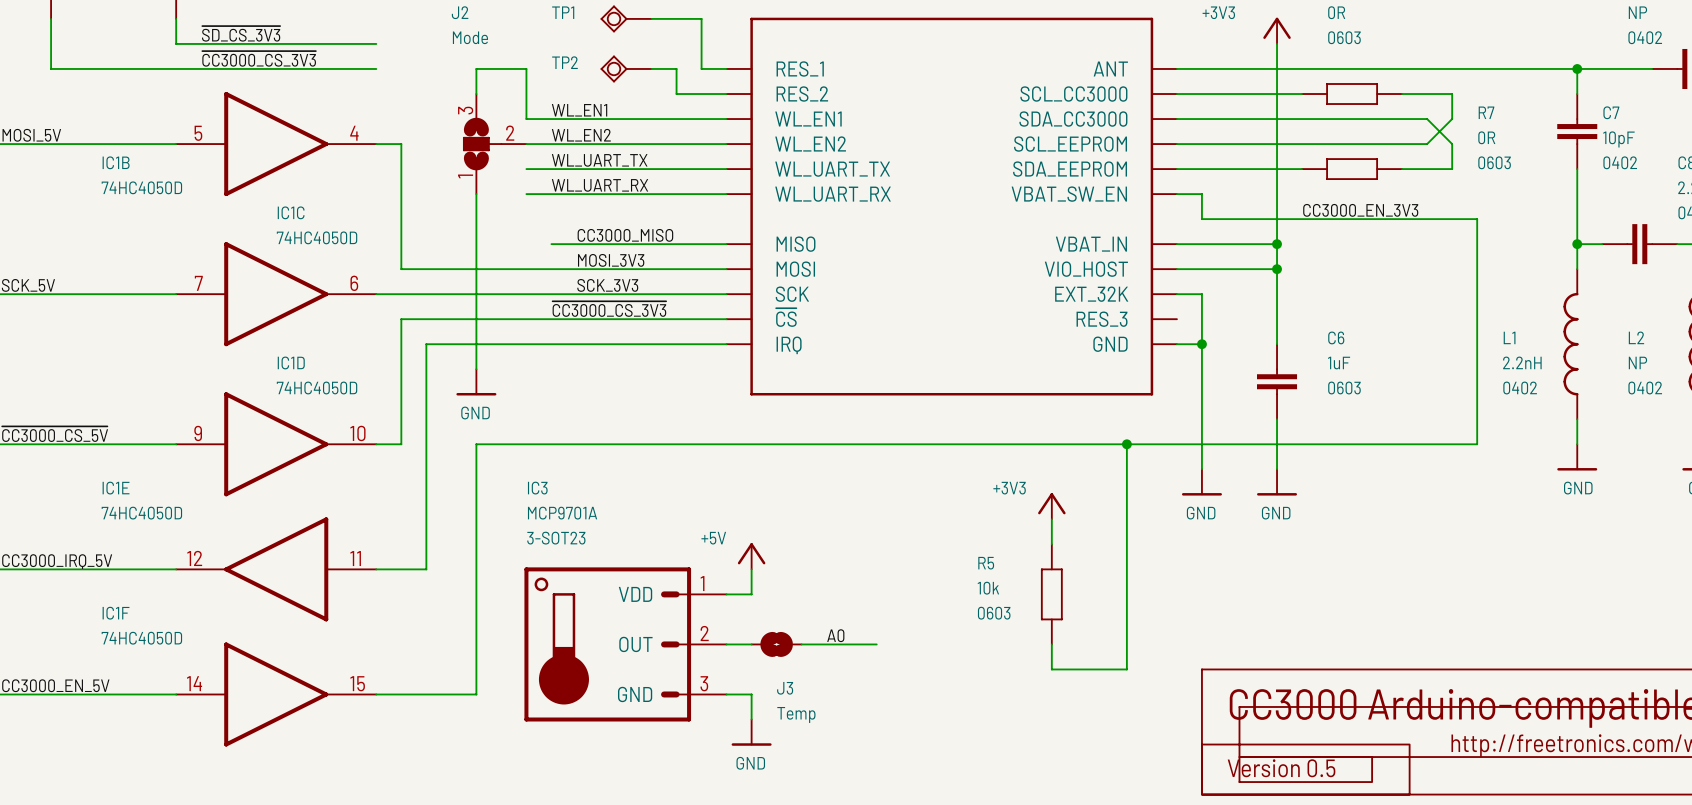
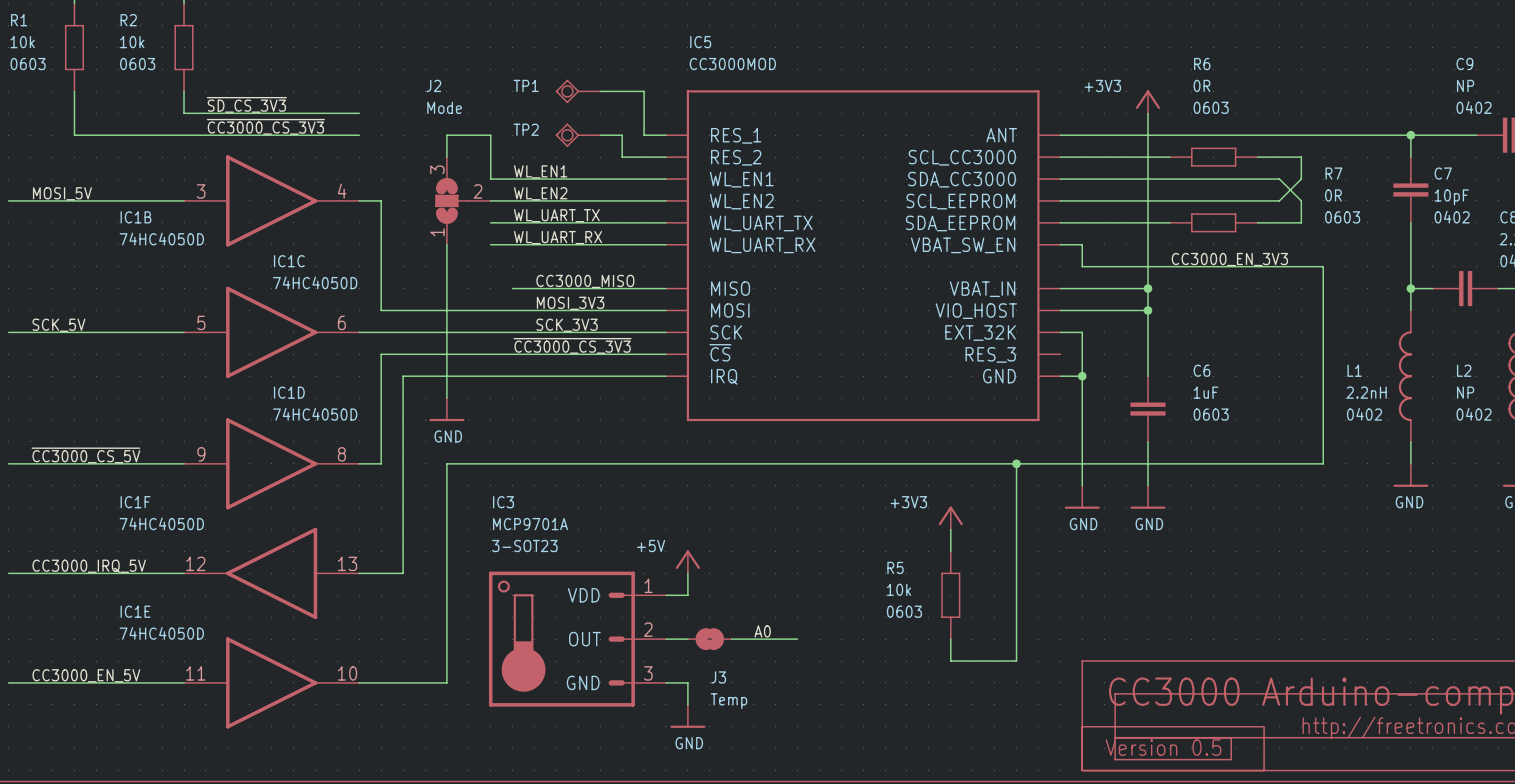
IC1B pin number: 5 (198, 133) -> 3 (201, 191)
IC1C pin number: 7 (198, 283) -> 5 (201, 322)
IC1D pin number: 10 (357, 433) -> 8 (341, 454)
IC1E symbol: [176, 517, 377, 622] -> [184, 637, 360, 729]
IC1F symbol: [176, 642, 377, 747] -> [184, 527, 360, 619]

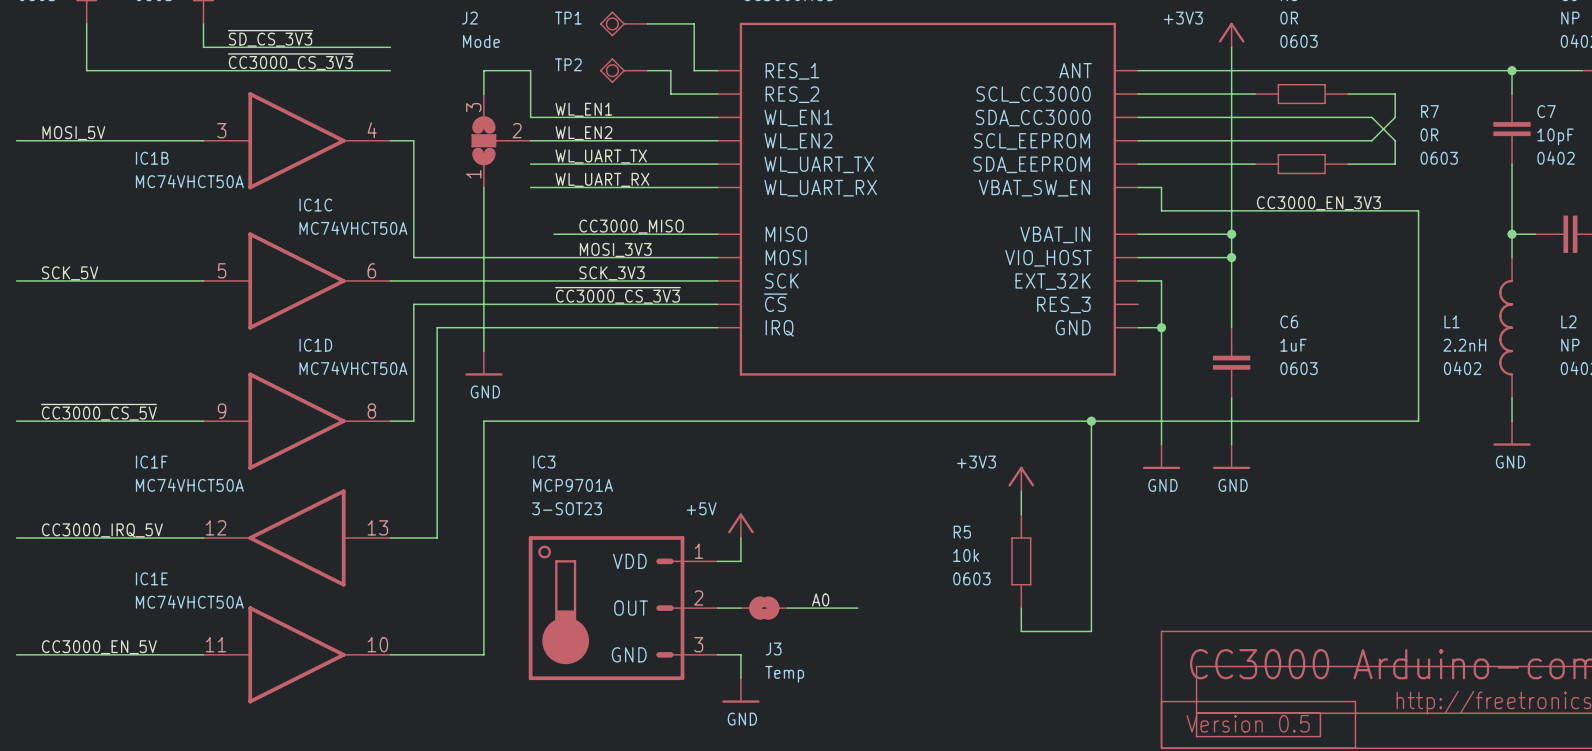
IC1B value: 74HC4050D (161, 239) -> MC74VHCT50A (189, 181)
IC1C value: 74HC4050D (315, 282) -> MC74VHCT50A (353, 228)
IC1D value: 74HC4050D (315, 414) -> MC74VHCT50A (353, 368)
IC1F value: 74HC4050D (161, 523) -> MC74VHCT50A (189, 485)
IC1E value: 74HC4050D (161, 633) -> MC74VHCT50A (189, 601)

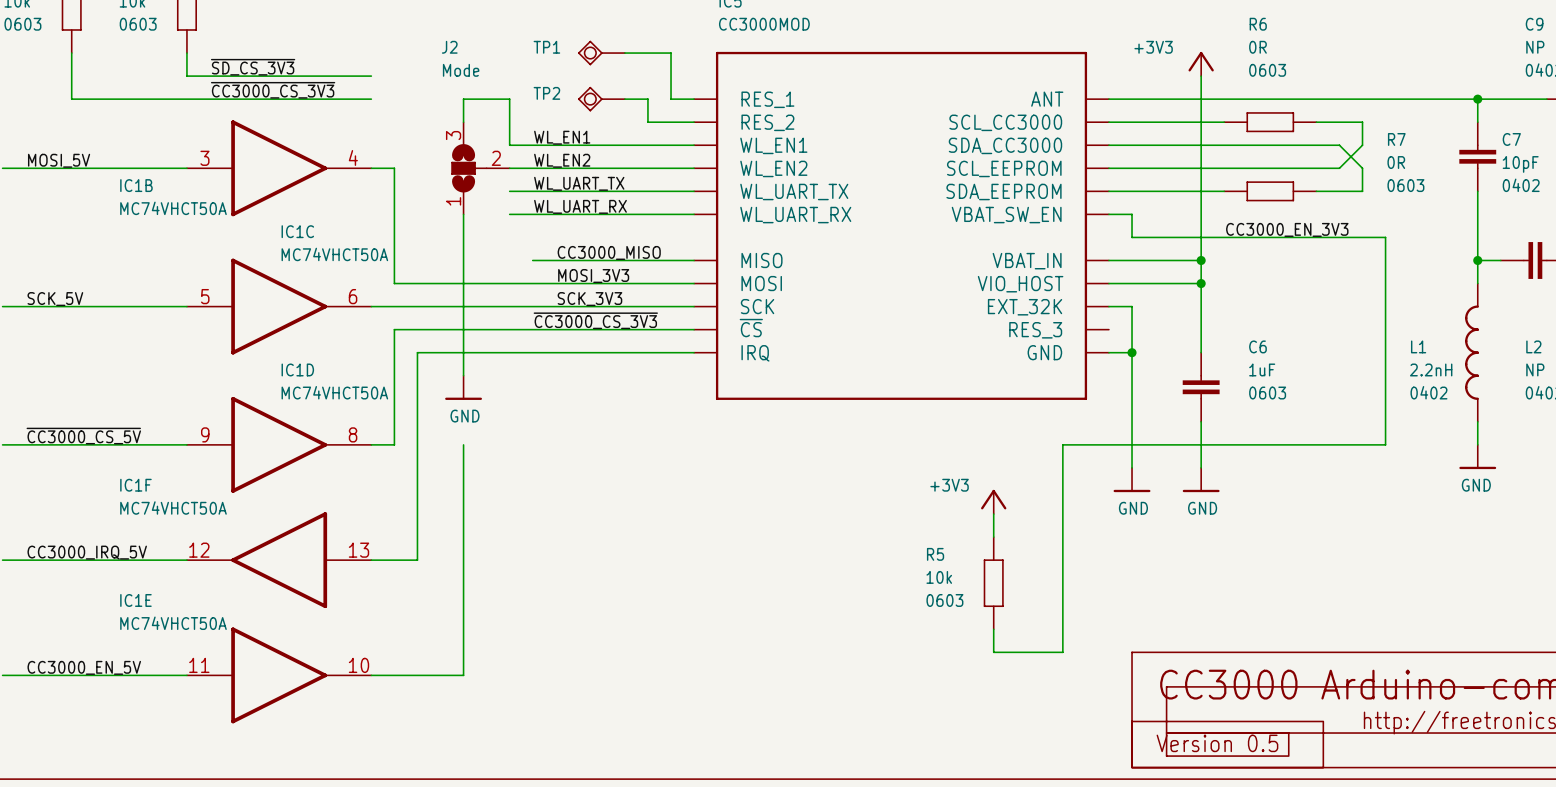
wire: (483, 421) (1091, 421) -> none
junction: (1091, 421) -> none
power symbol: +5V (740, 525) -> none
wire: (740, 538) (740, 561) (717, 561) -> none
label: A0 (820, 599) -> none
IC3: MCP9701A (623, 608) -> none
wire: (717, 608) (740, 608) -> none
J3: Temp (764, 608) -> none
wire: (787, 608) (857, 608) -> none
wire: (717, 654) (740, 654) (740, 678) -> none
power symbol: GND (740, 690) -> none

